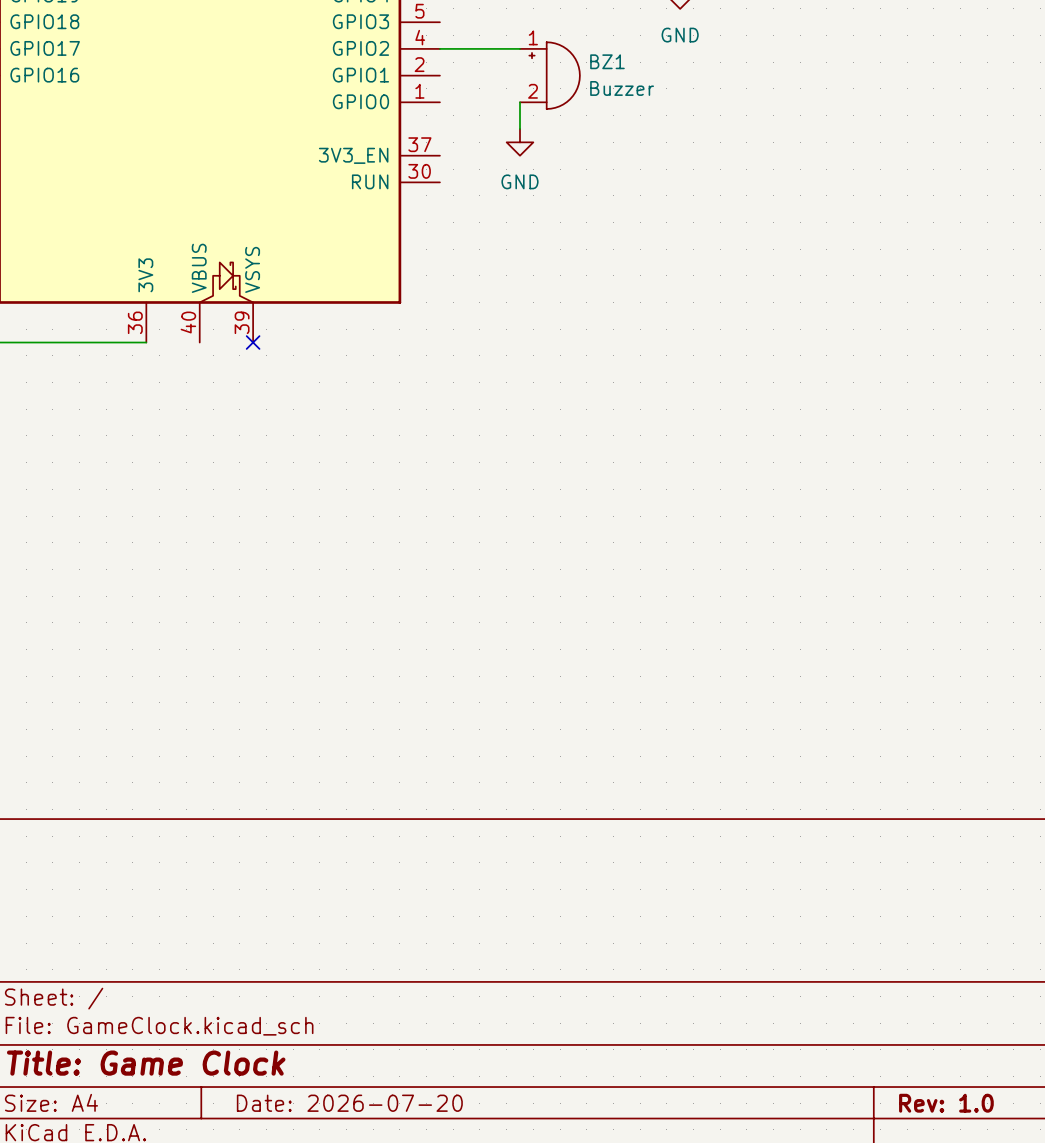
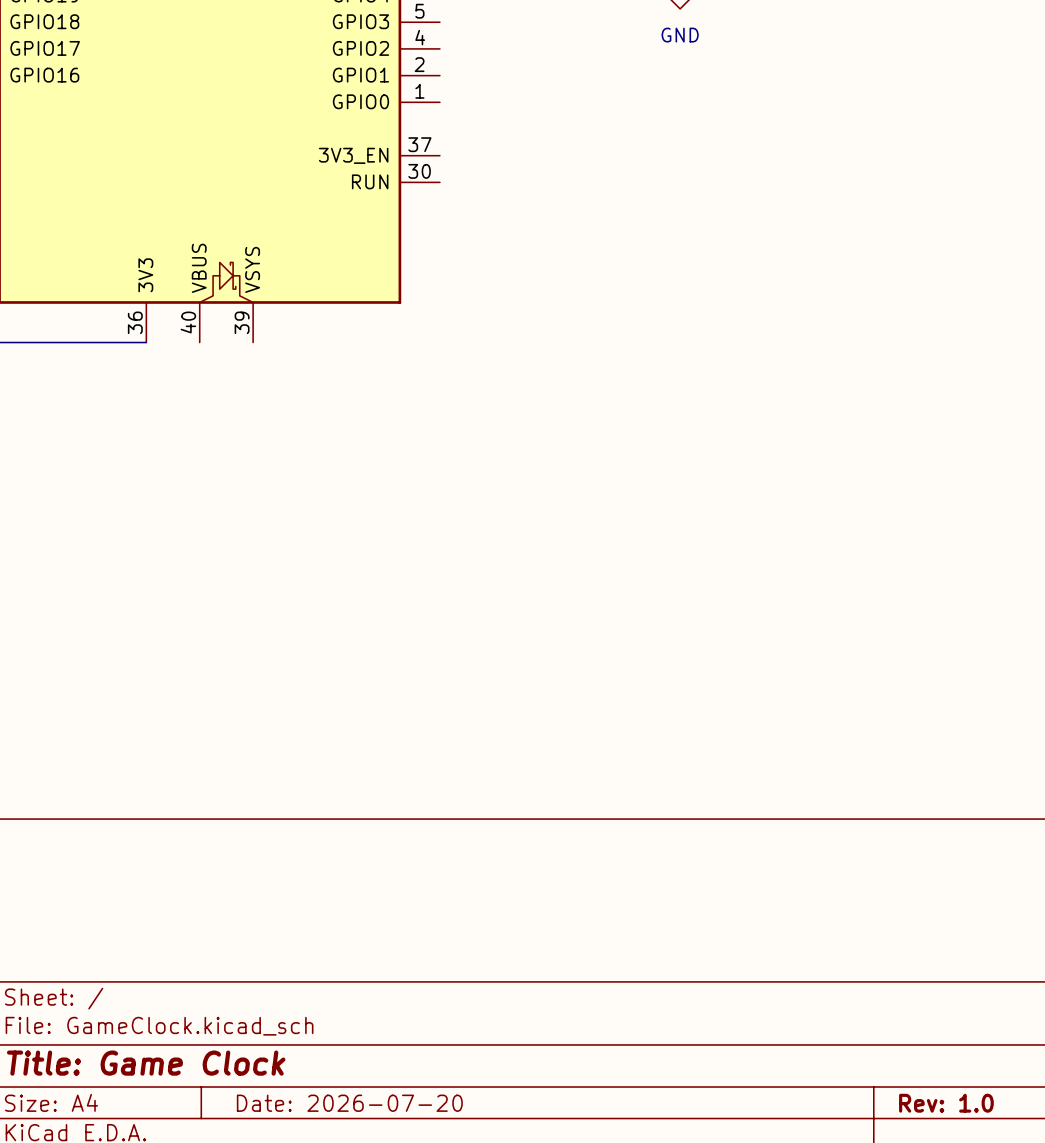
wire: (439, 48) (520, 48) -> none
BZ1: Buzzer (549, 75) -> none
wire: (520, 102) (520, 129) -> none
power symbol: GND (520, 142) -> none
no-connect mark: (253, 342) -> none

